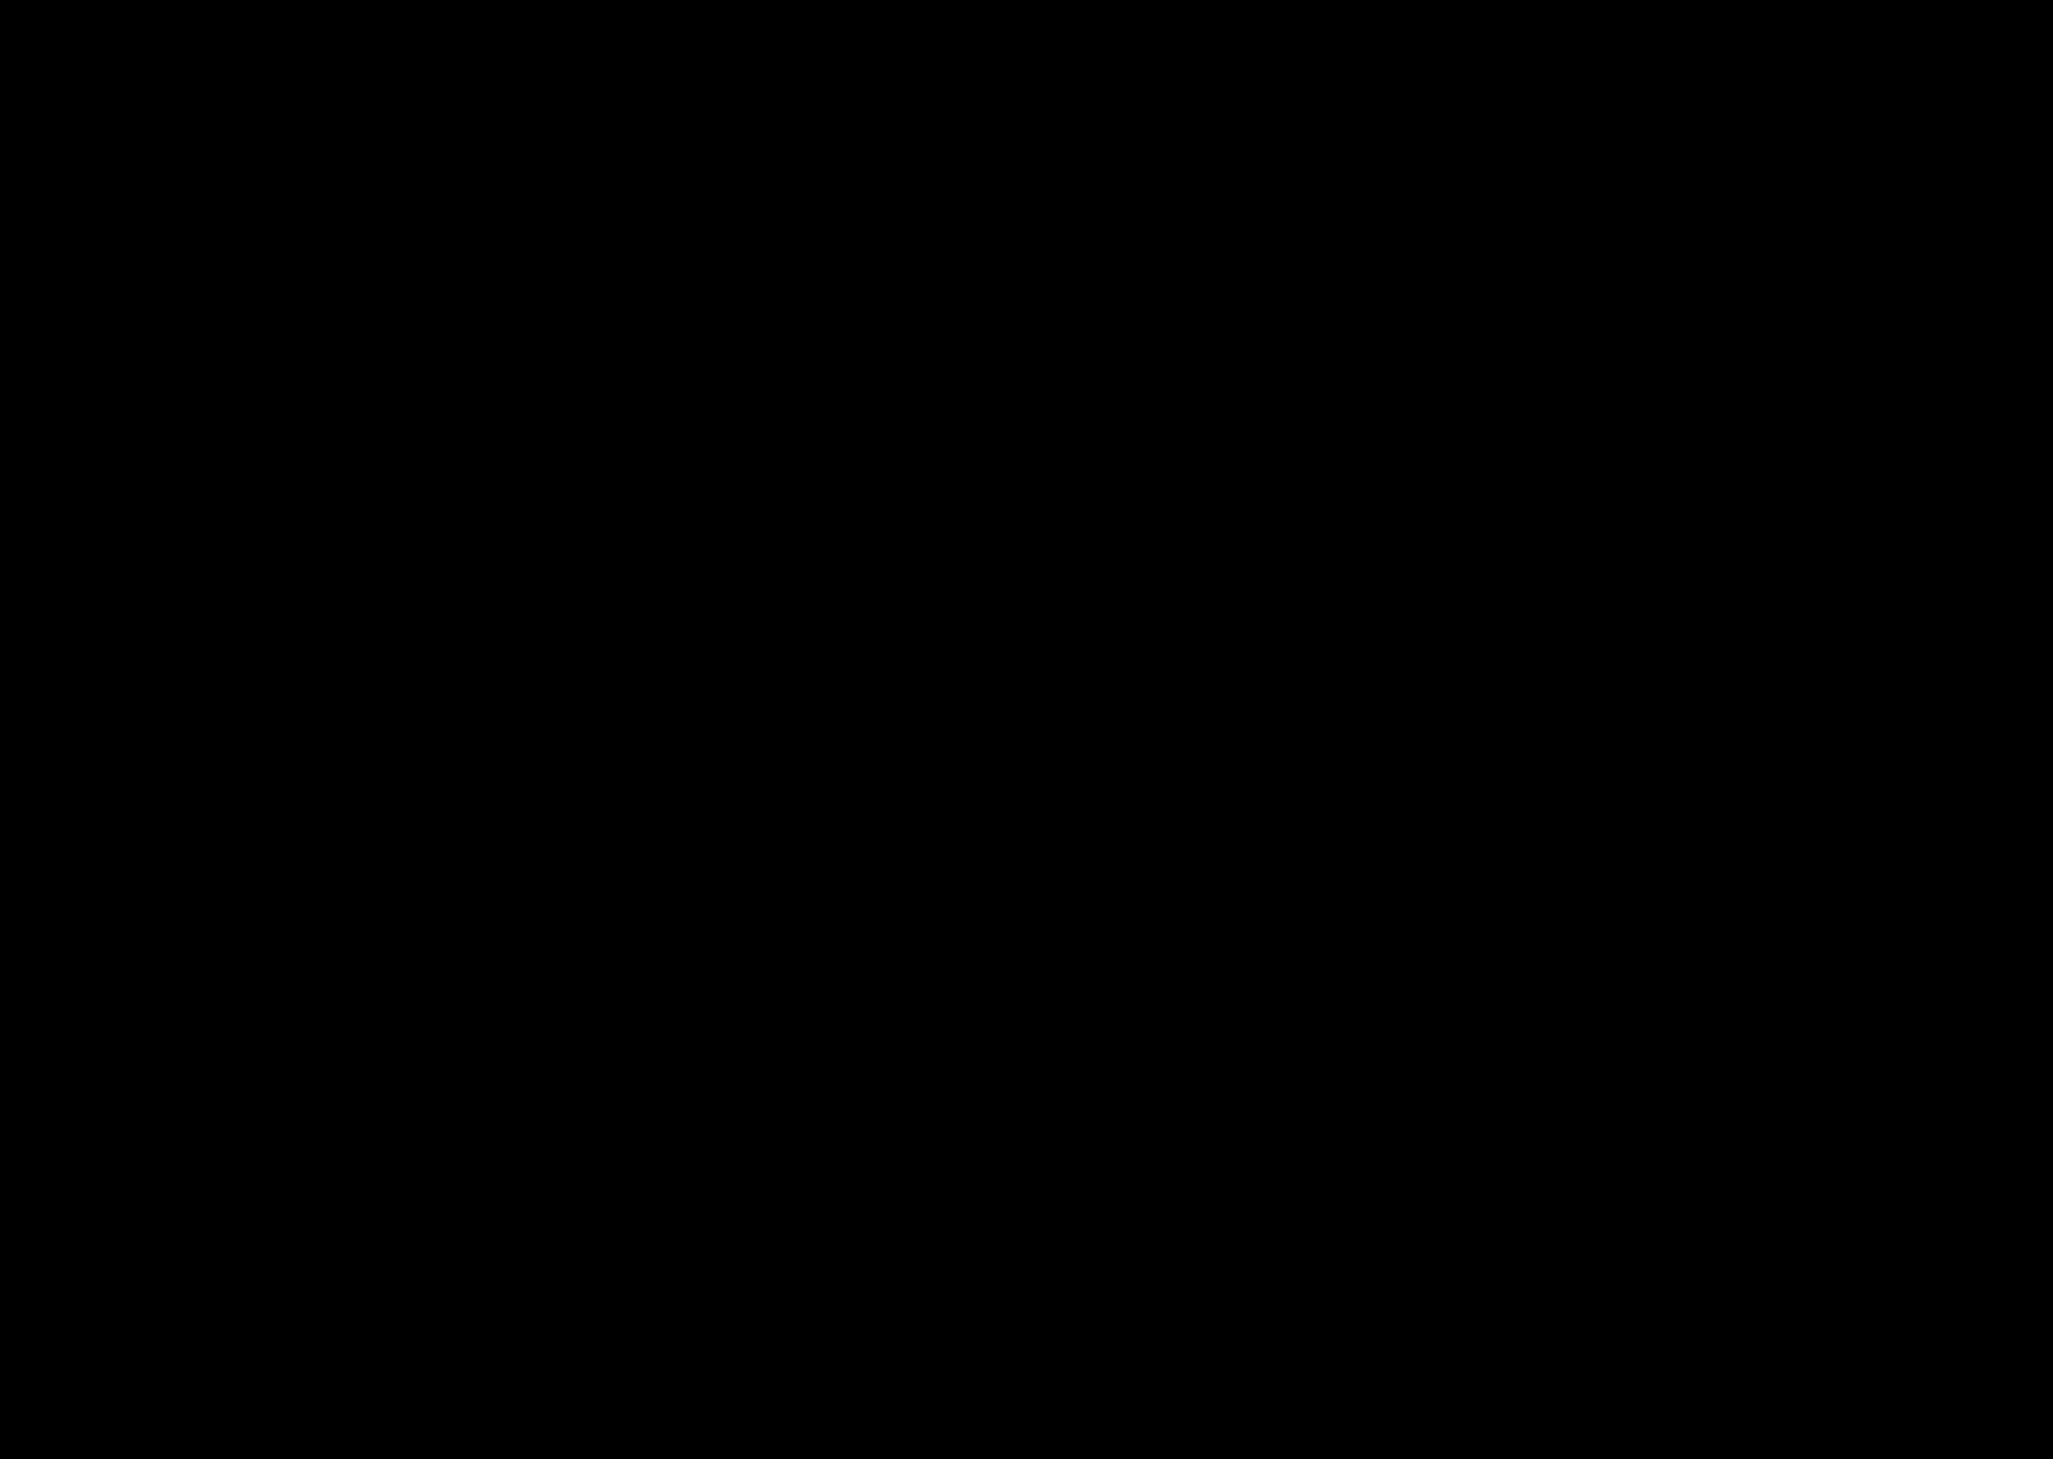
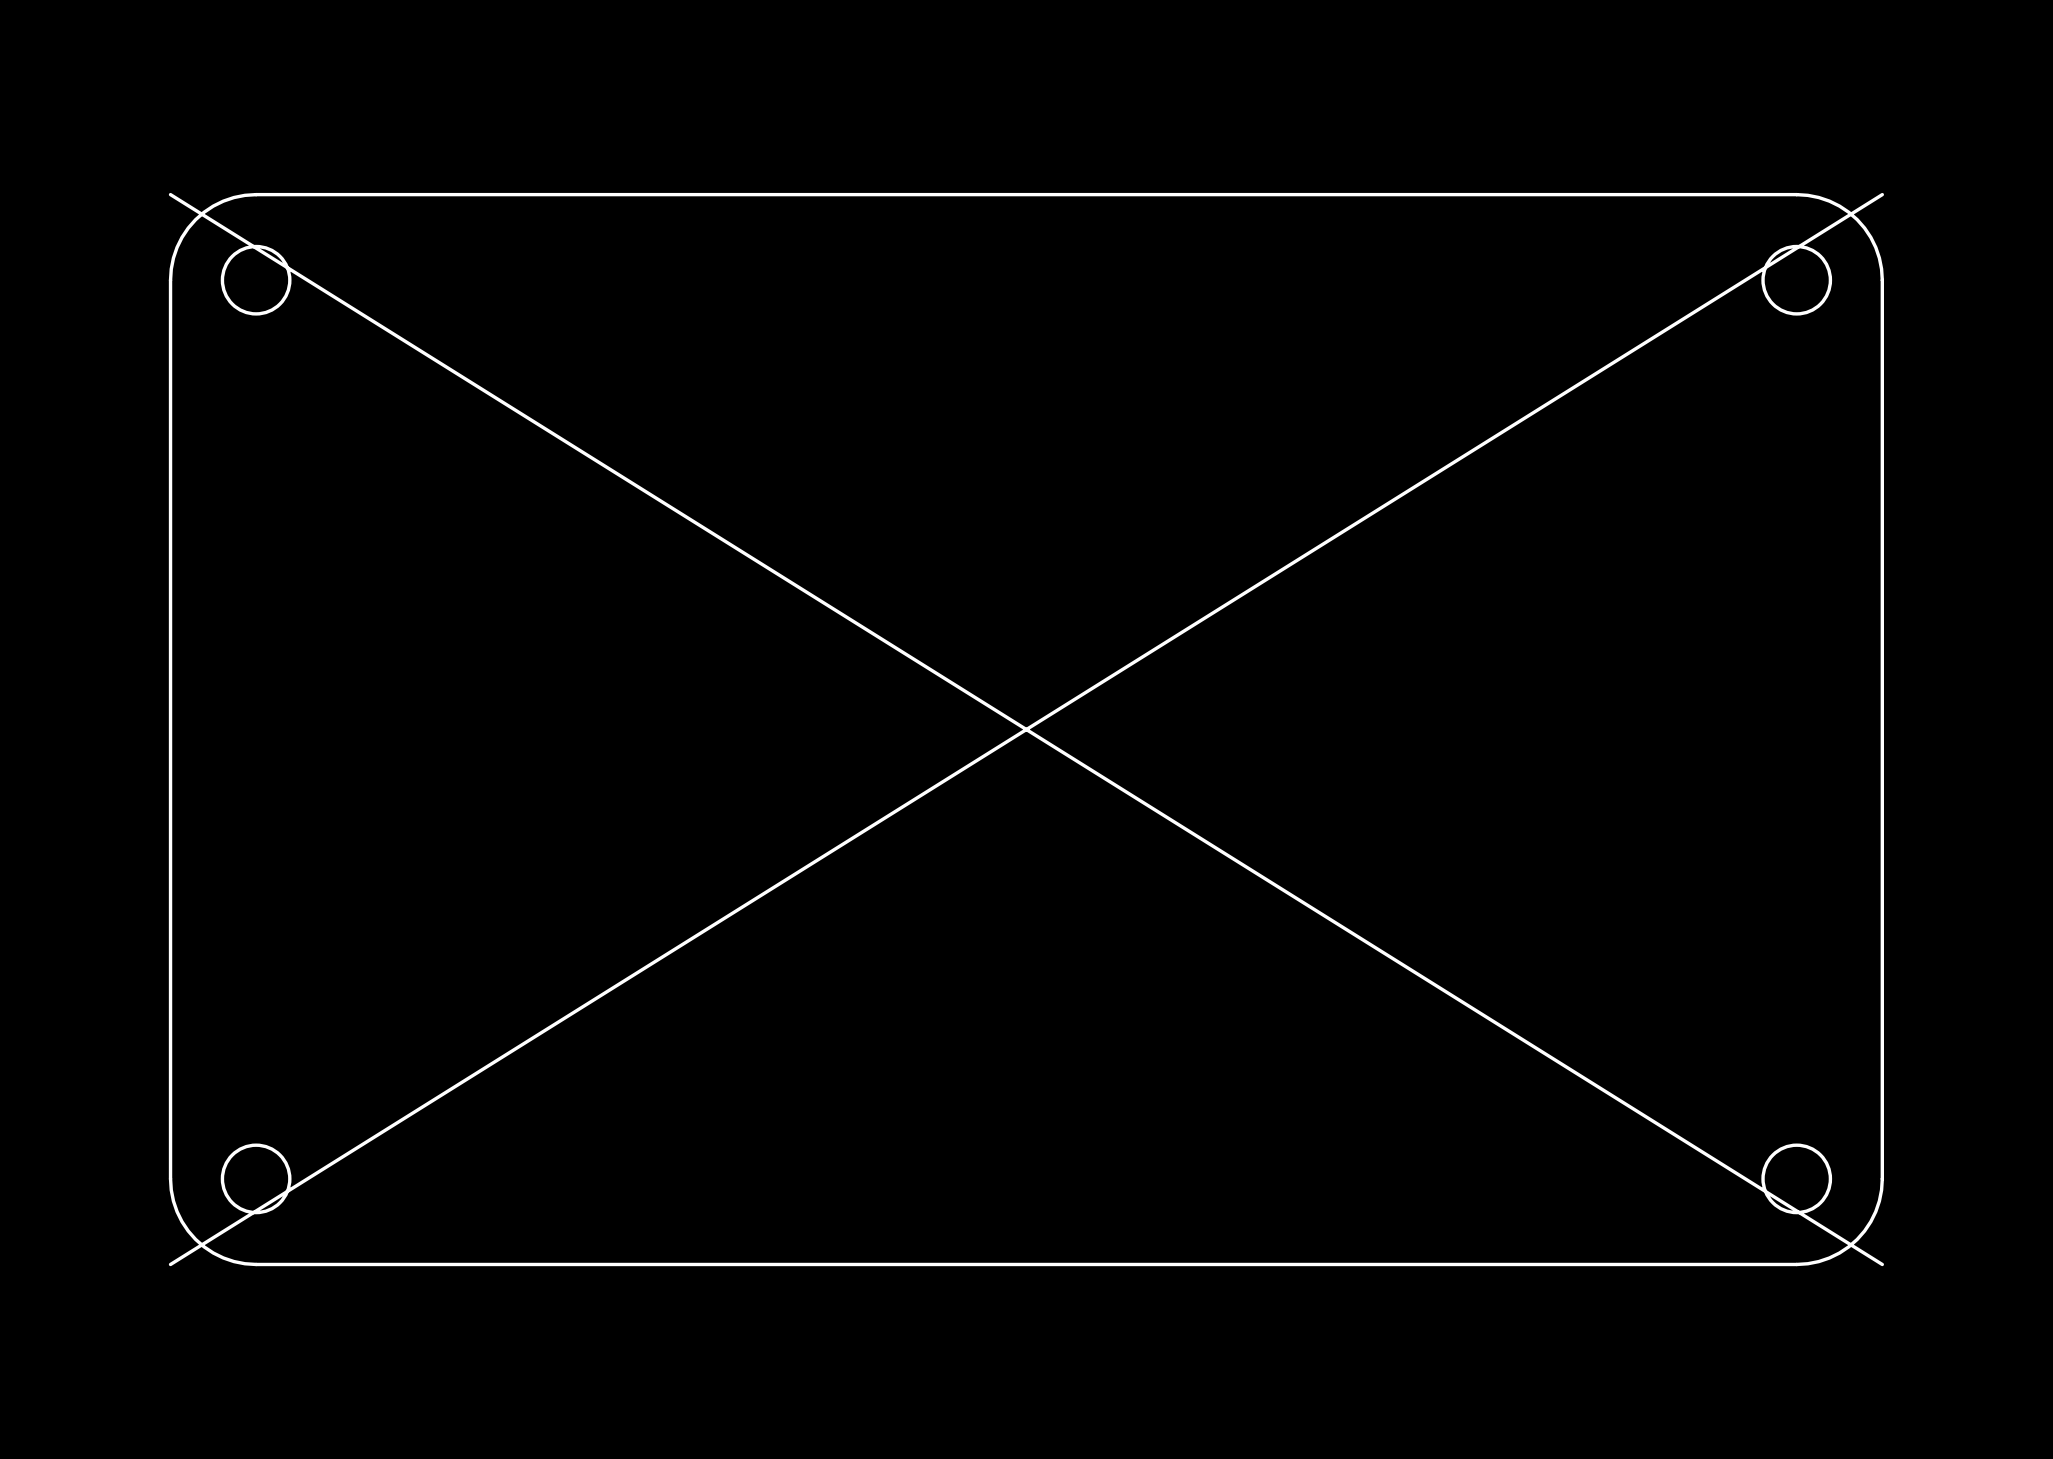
board edge: none -> (170, 194) (1882, 1264)
board edge: none -> (256, 194) (1796, 194) (1818, 197) (1839, 206) (1857, 219) (1870, 237) (1879, 258) (1882, 280) (1882, 1178) (1879, 1201) (1870, 1221) (1857, 1239) (1839, 1253) (1818, 1261) (1796, 1264) (256, 1264) (233, 1261) (213, 1253) (195, 1239) (182, 1221) (173, 1201) (170, 1178) (170, 280) (177, 247) (195, 219) (223, 201) (256, 194)
board edge: none -> (1882, 194) (170, 1264)
round board edge: none -> [220, 244, 292, 316]
round board edge: none -> [1761, 244, 1833, 316]
round board edge: none -> [220, 1143, 292, 1215]
round board edge: none -> [1761, 1143, 1833, 1215]

